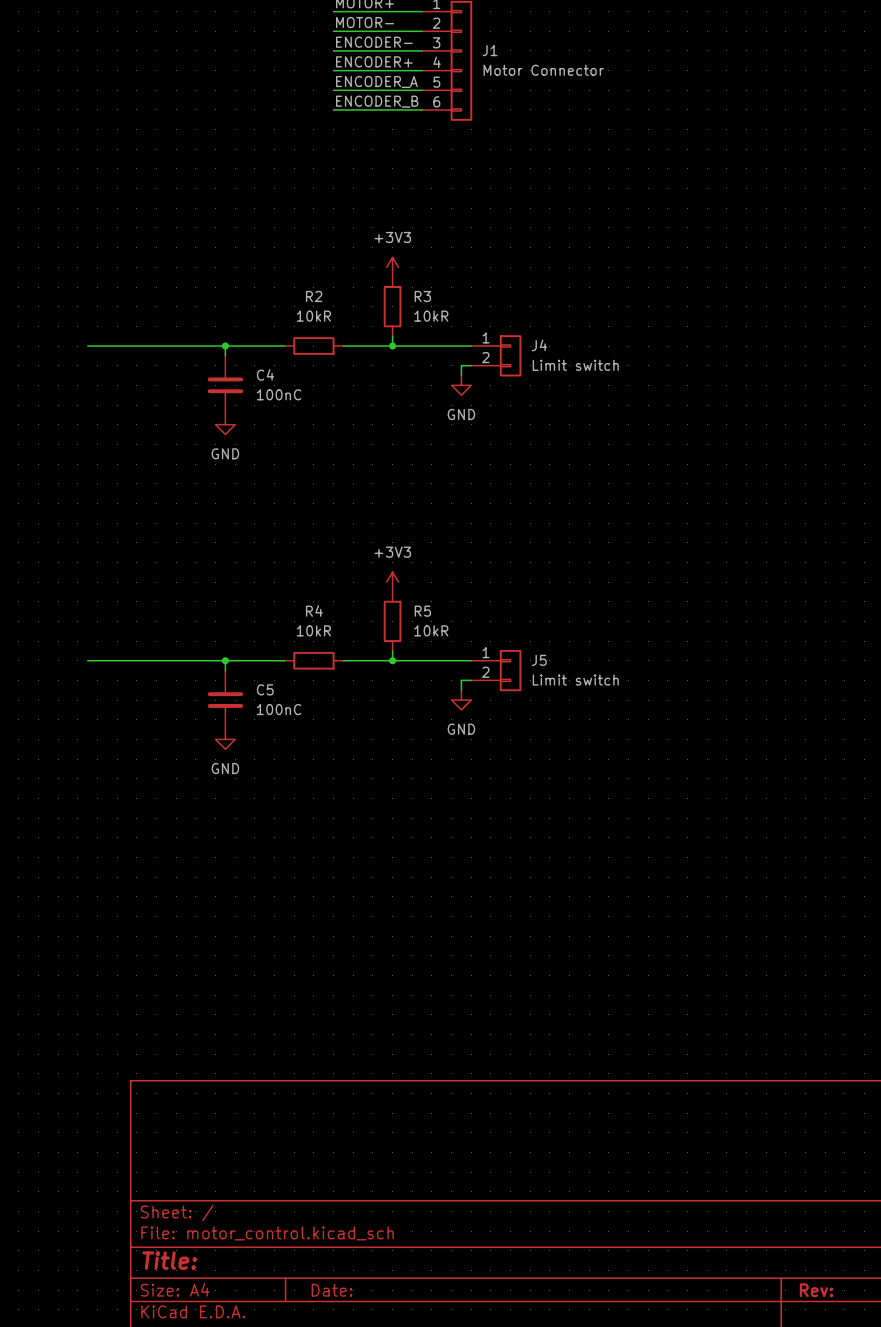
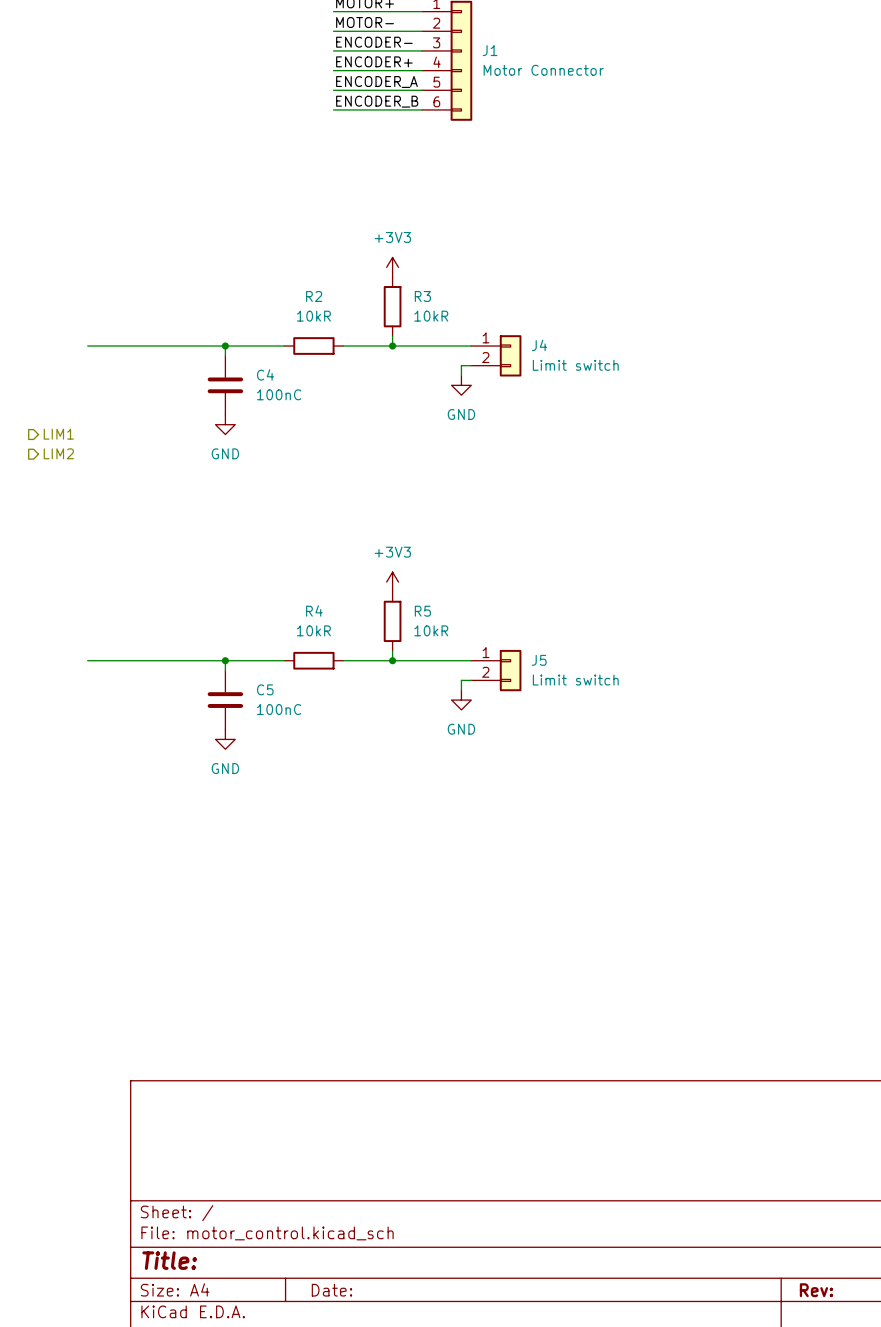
hierarchical label: none -> LIM1 (58, 434)
hierarchical label: none -> LIM2 (58, 453)

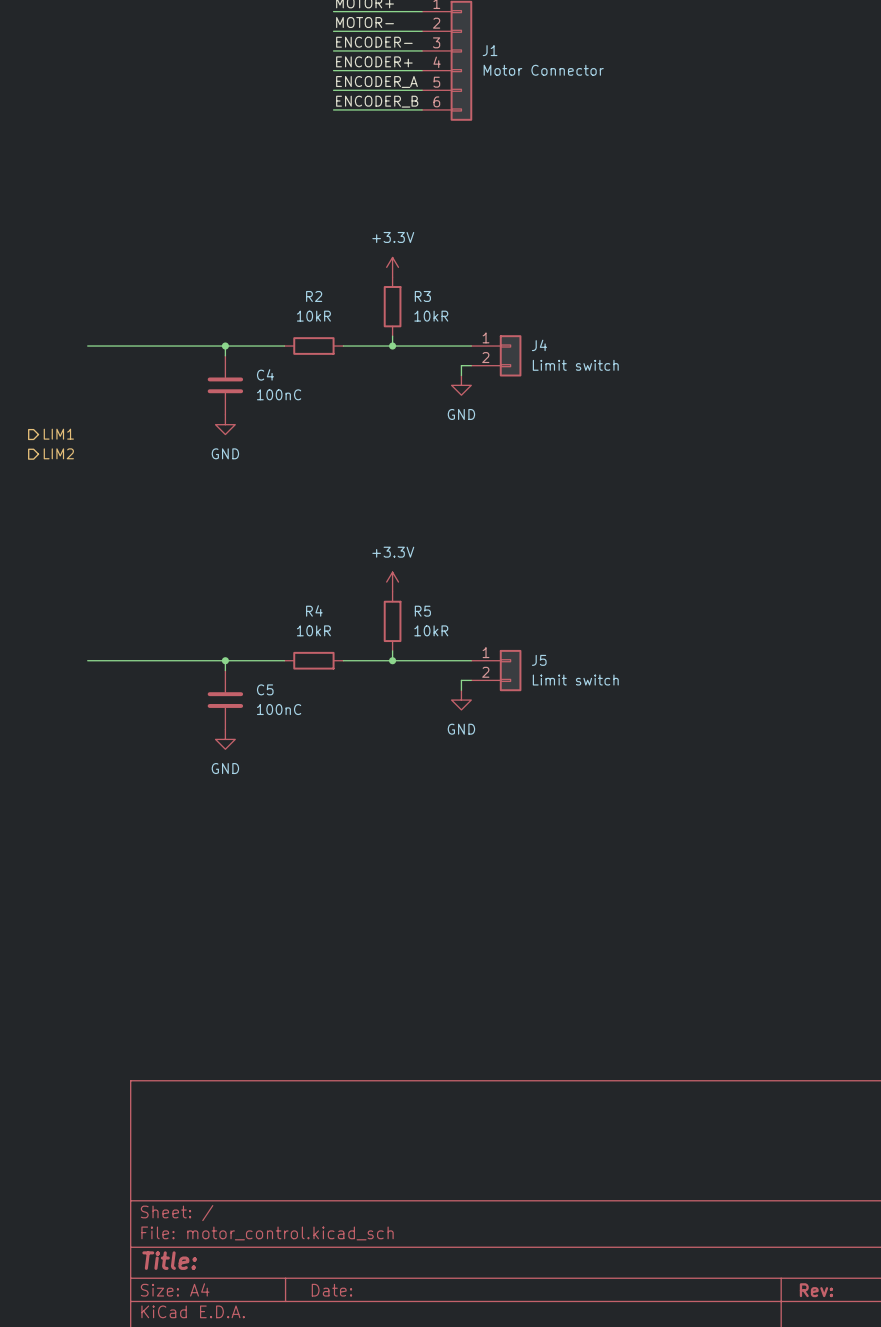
power symbol: +3V3 (392, 267) -> +3.3V (392, 267)
power symbol: +3V3 (392, 582) -> +3.3V (392, 582)

